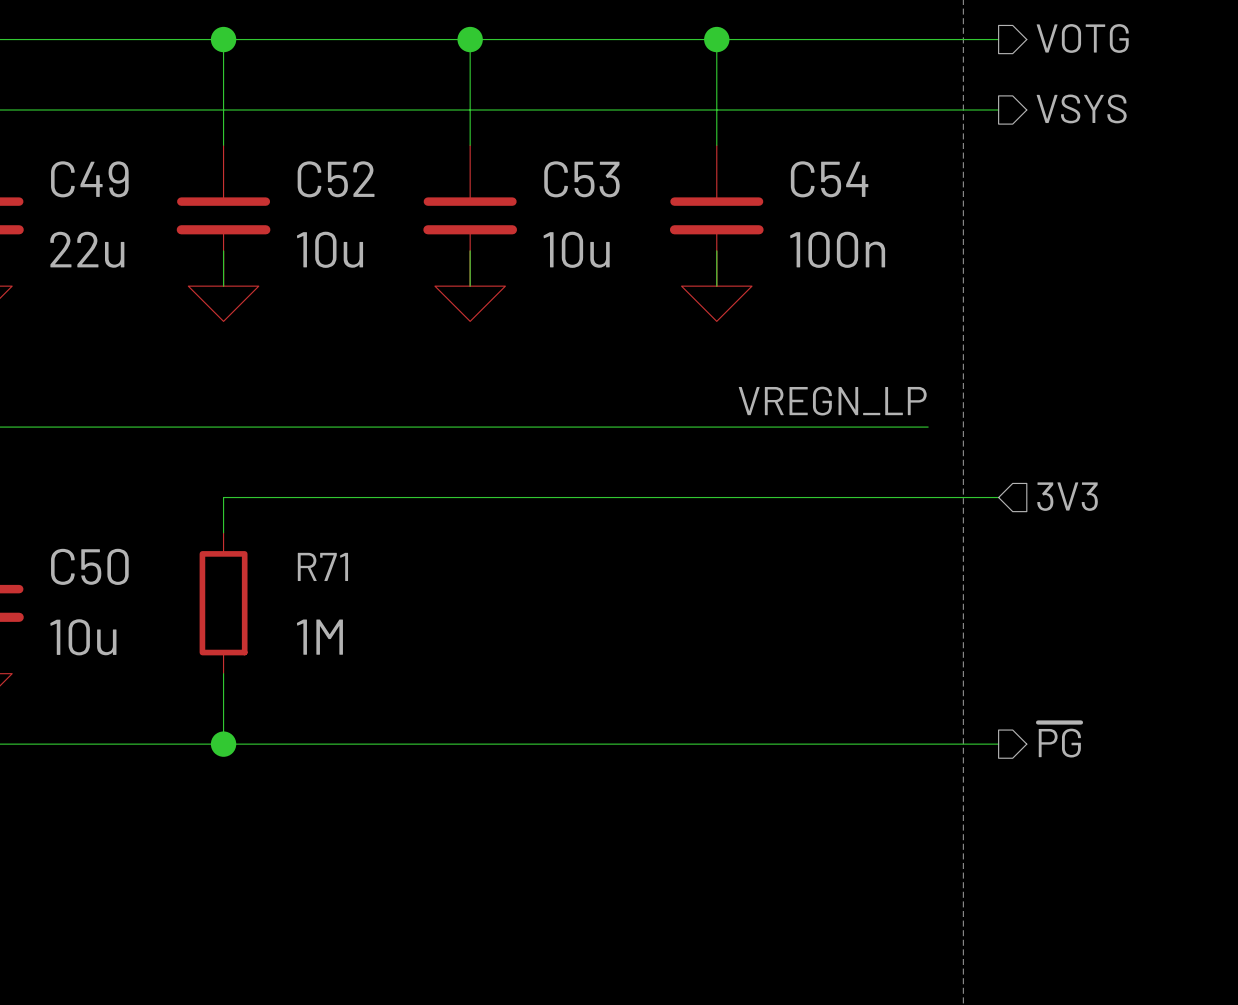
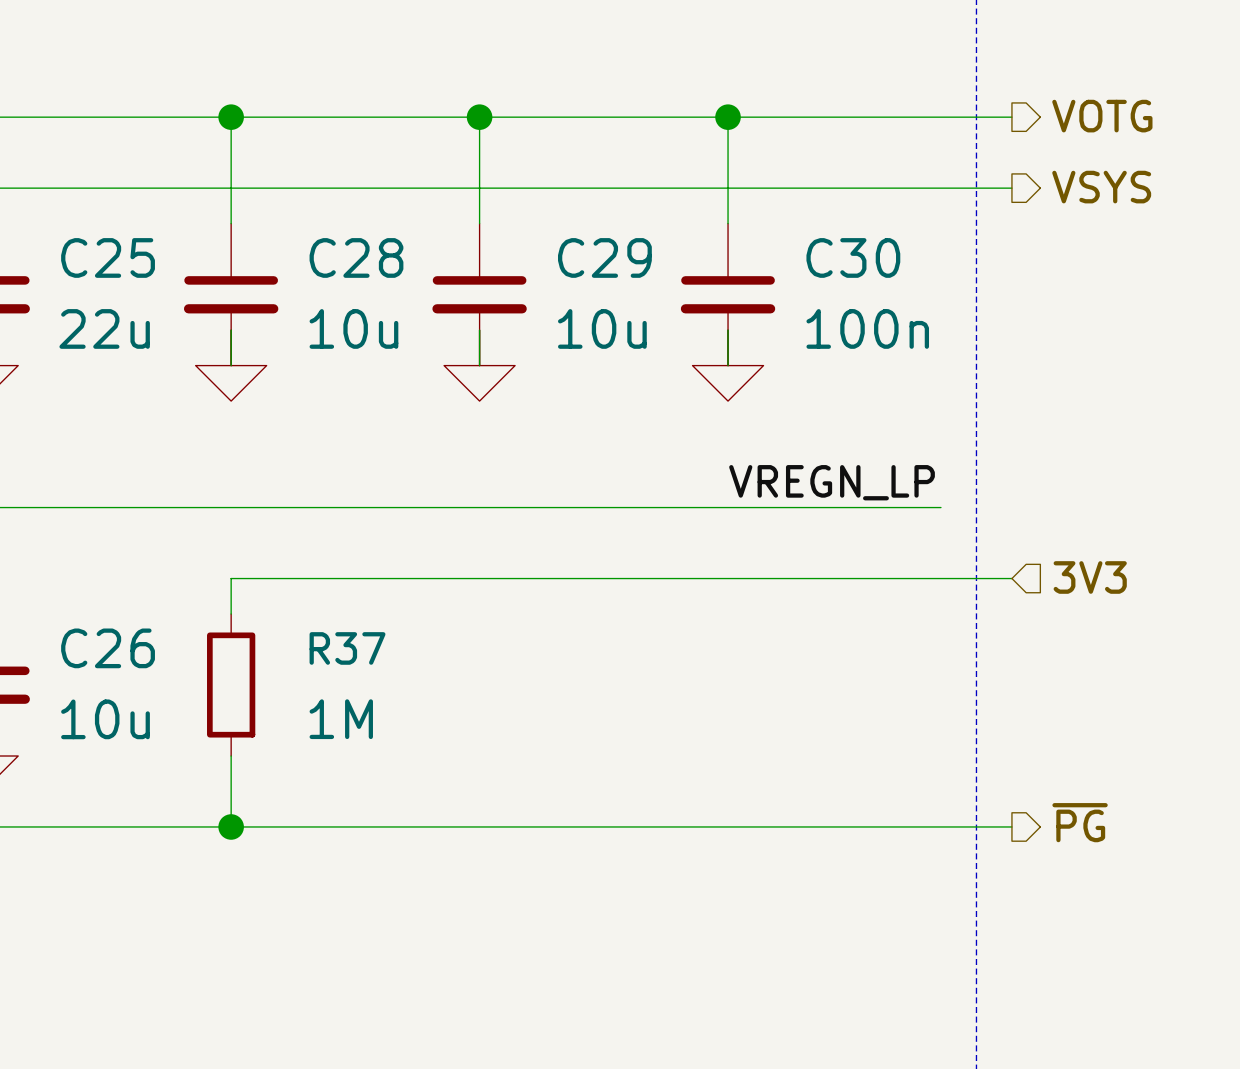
C49 name: C49 (89, 179) -> C25 (108, 257)
C52 name: C52 (336, 179) -> C28 (356, 257)
C53 name: C53 (581, 179) -> C29 (604, 257)
C54 name: C54 (829, 179) -> C30 (853, 257)
C50 name: C50 (89, 566) -> C26 (108, 648)
R71 name: R71 (322, 566) -> R37 (347, 648)

